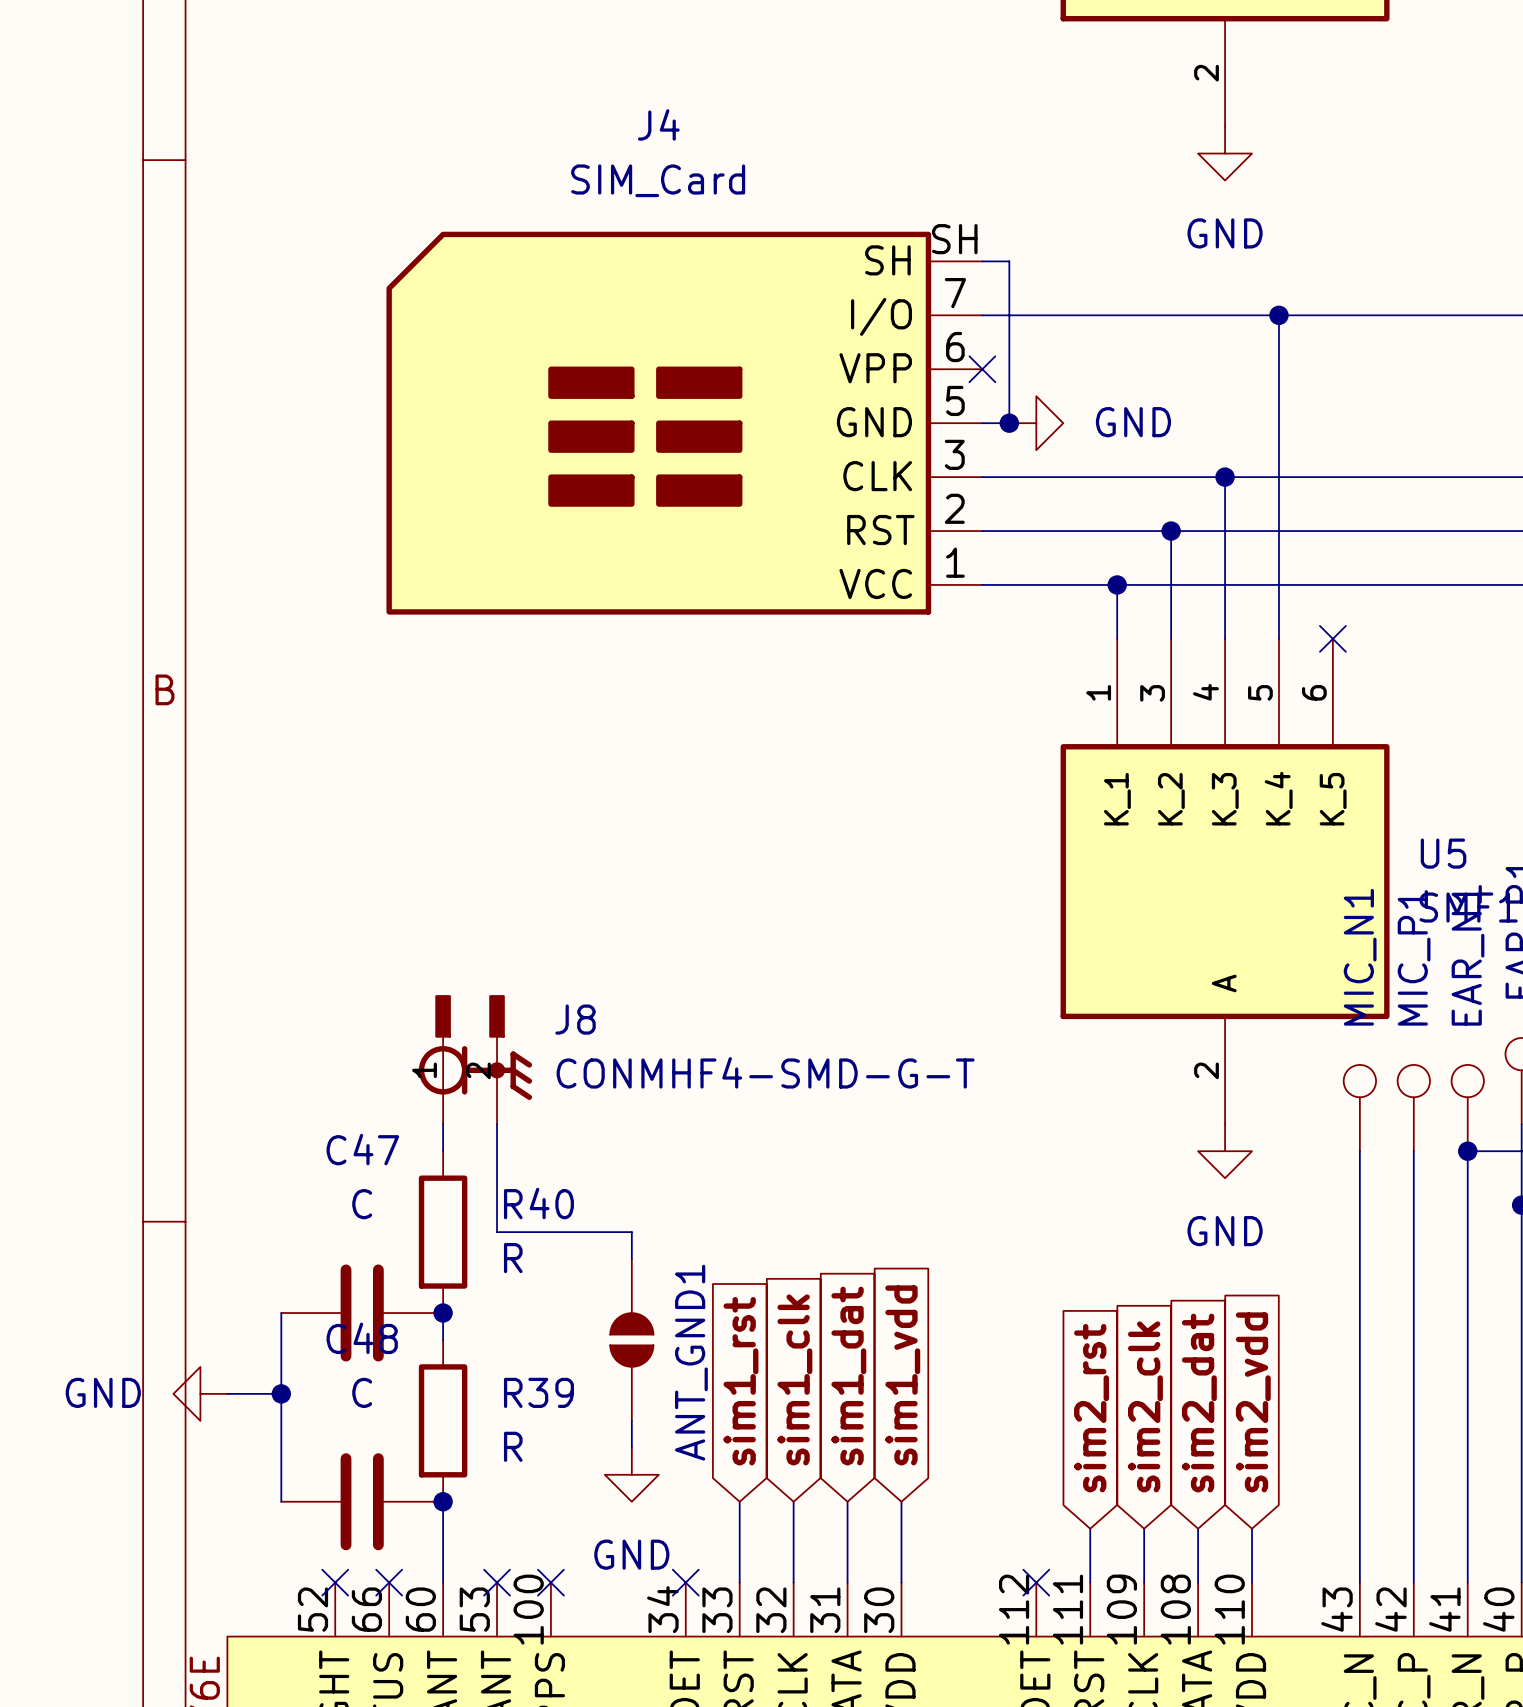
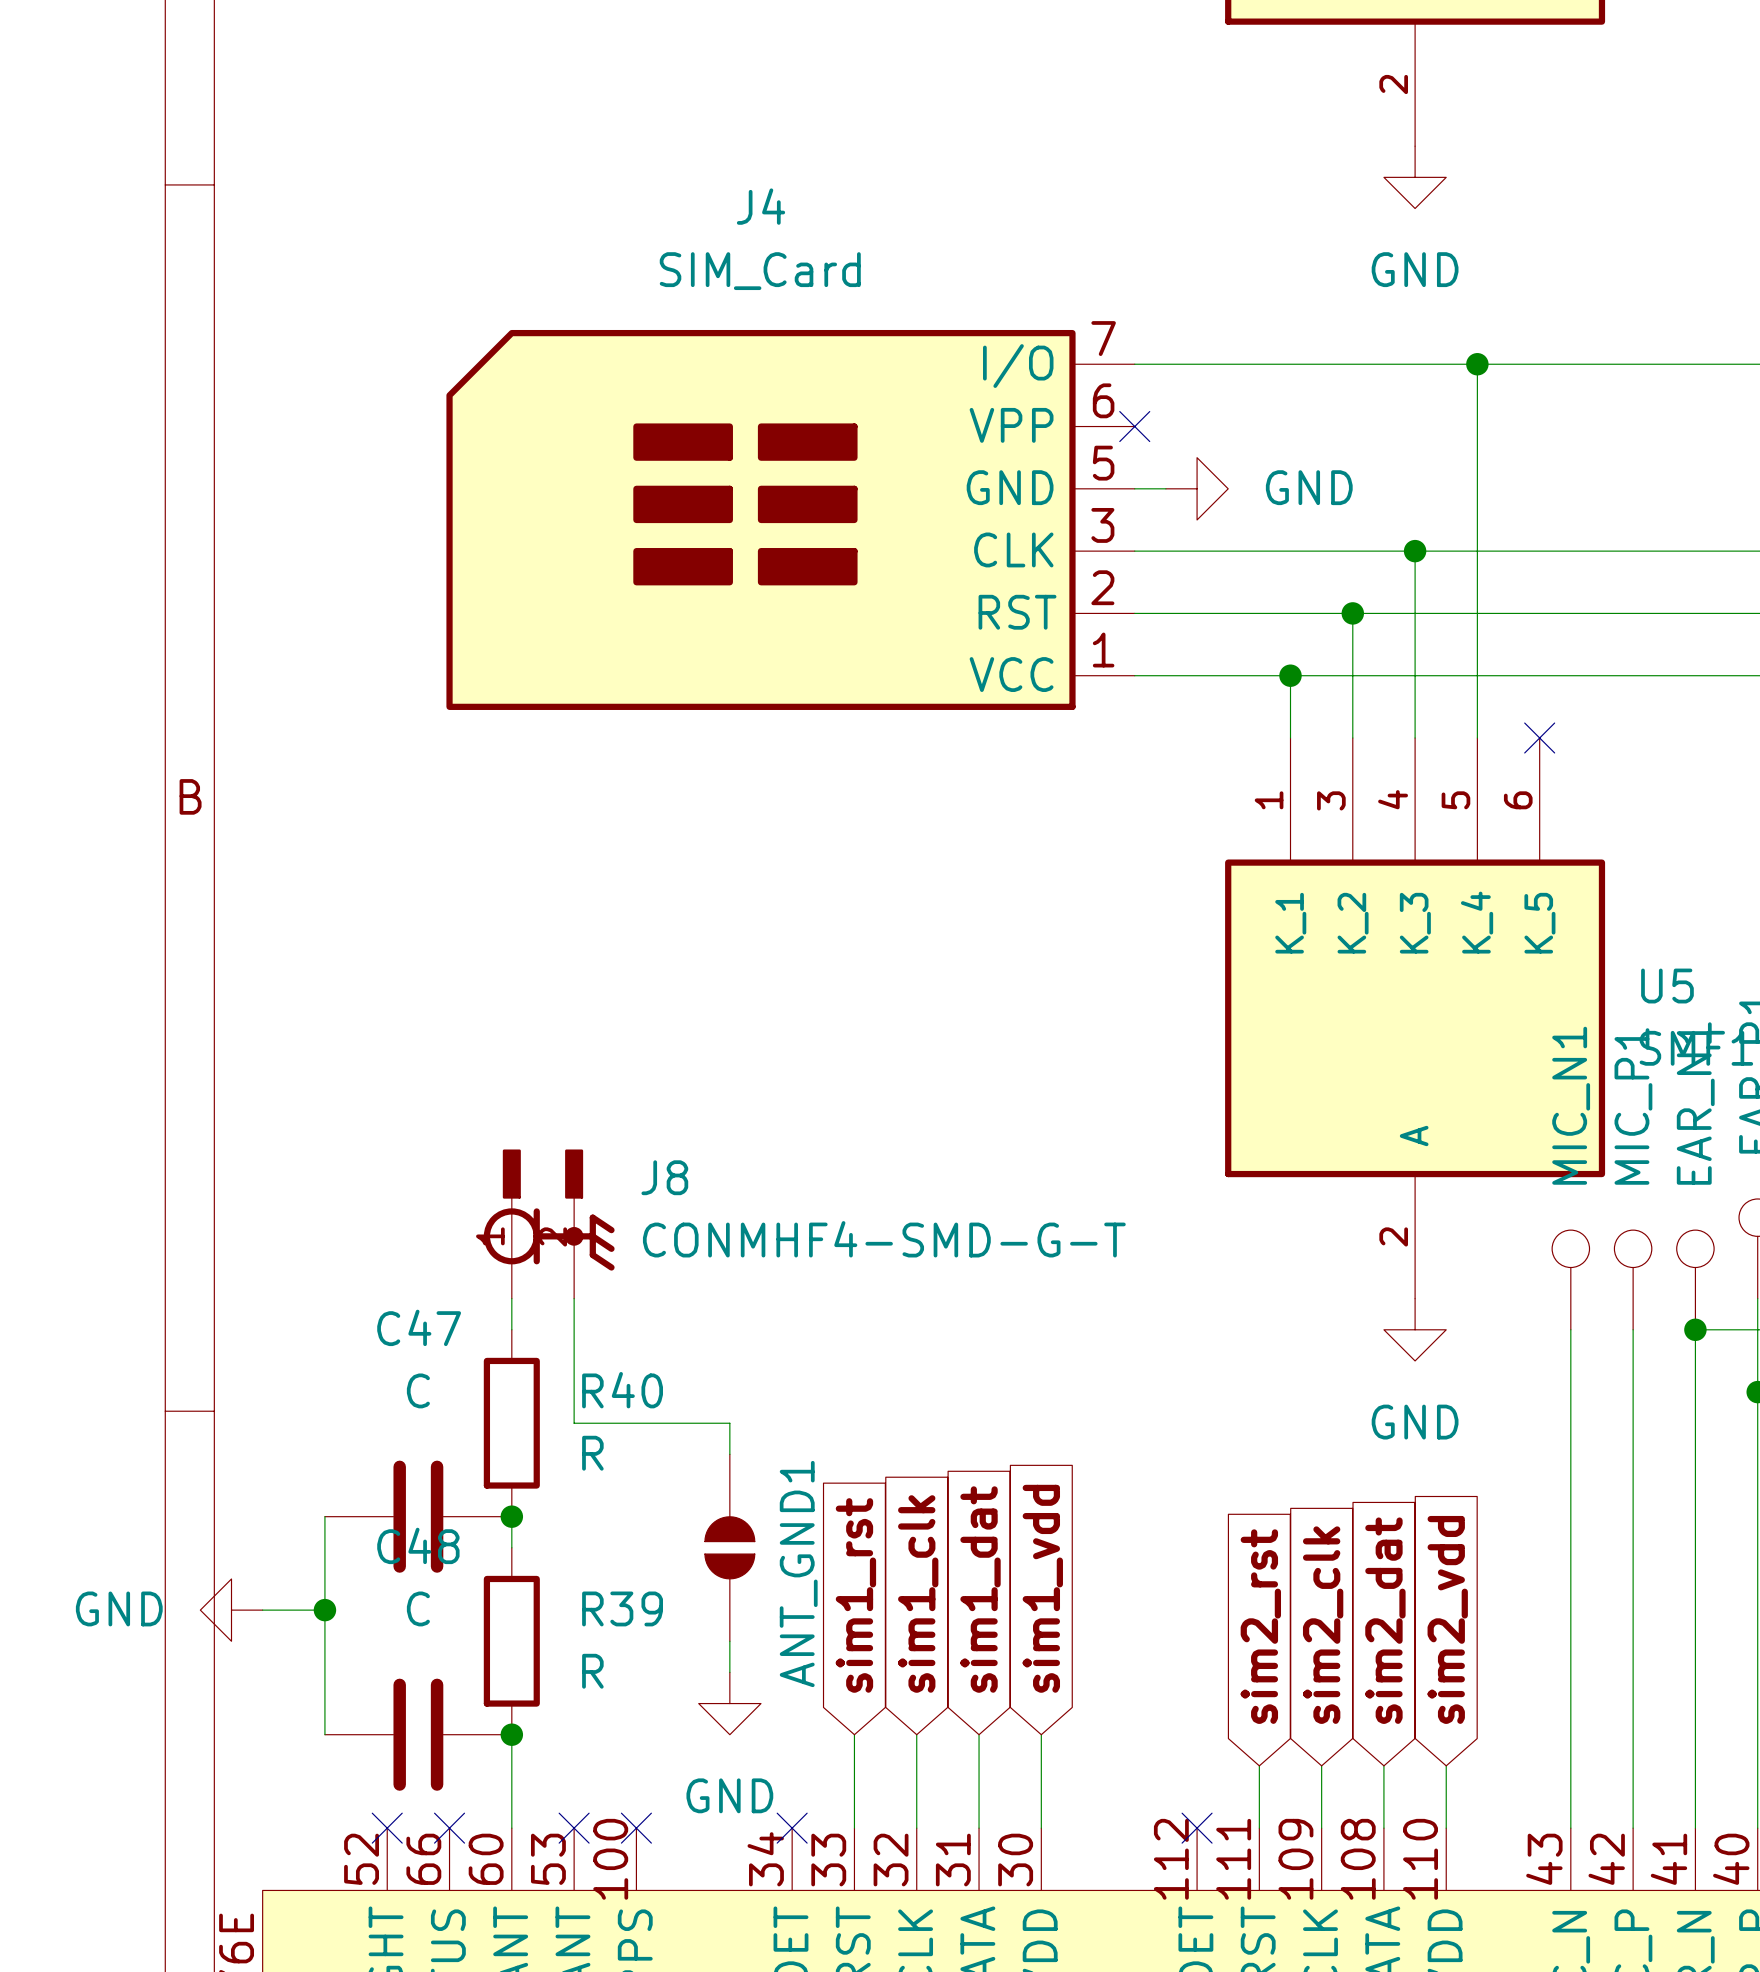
J4 symbol: [386, 231, 983, 615] -> [446, 329, 1135, 710]
wire: (982, 261) (1009, 261) (1009, 423) -> none
junction: (1009, 423) -> none

